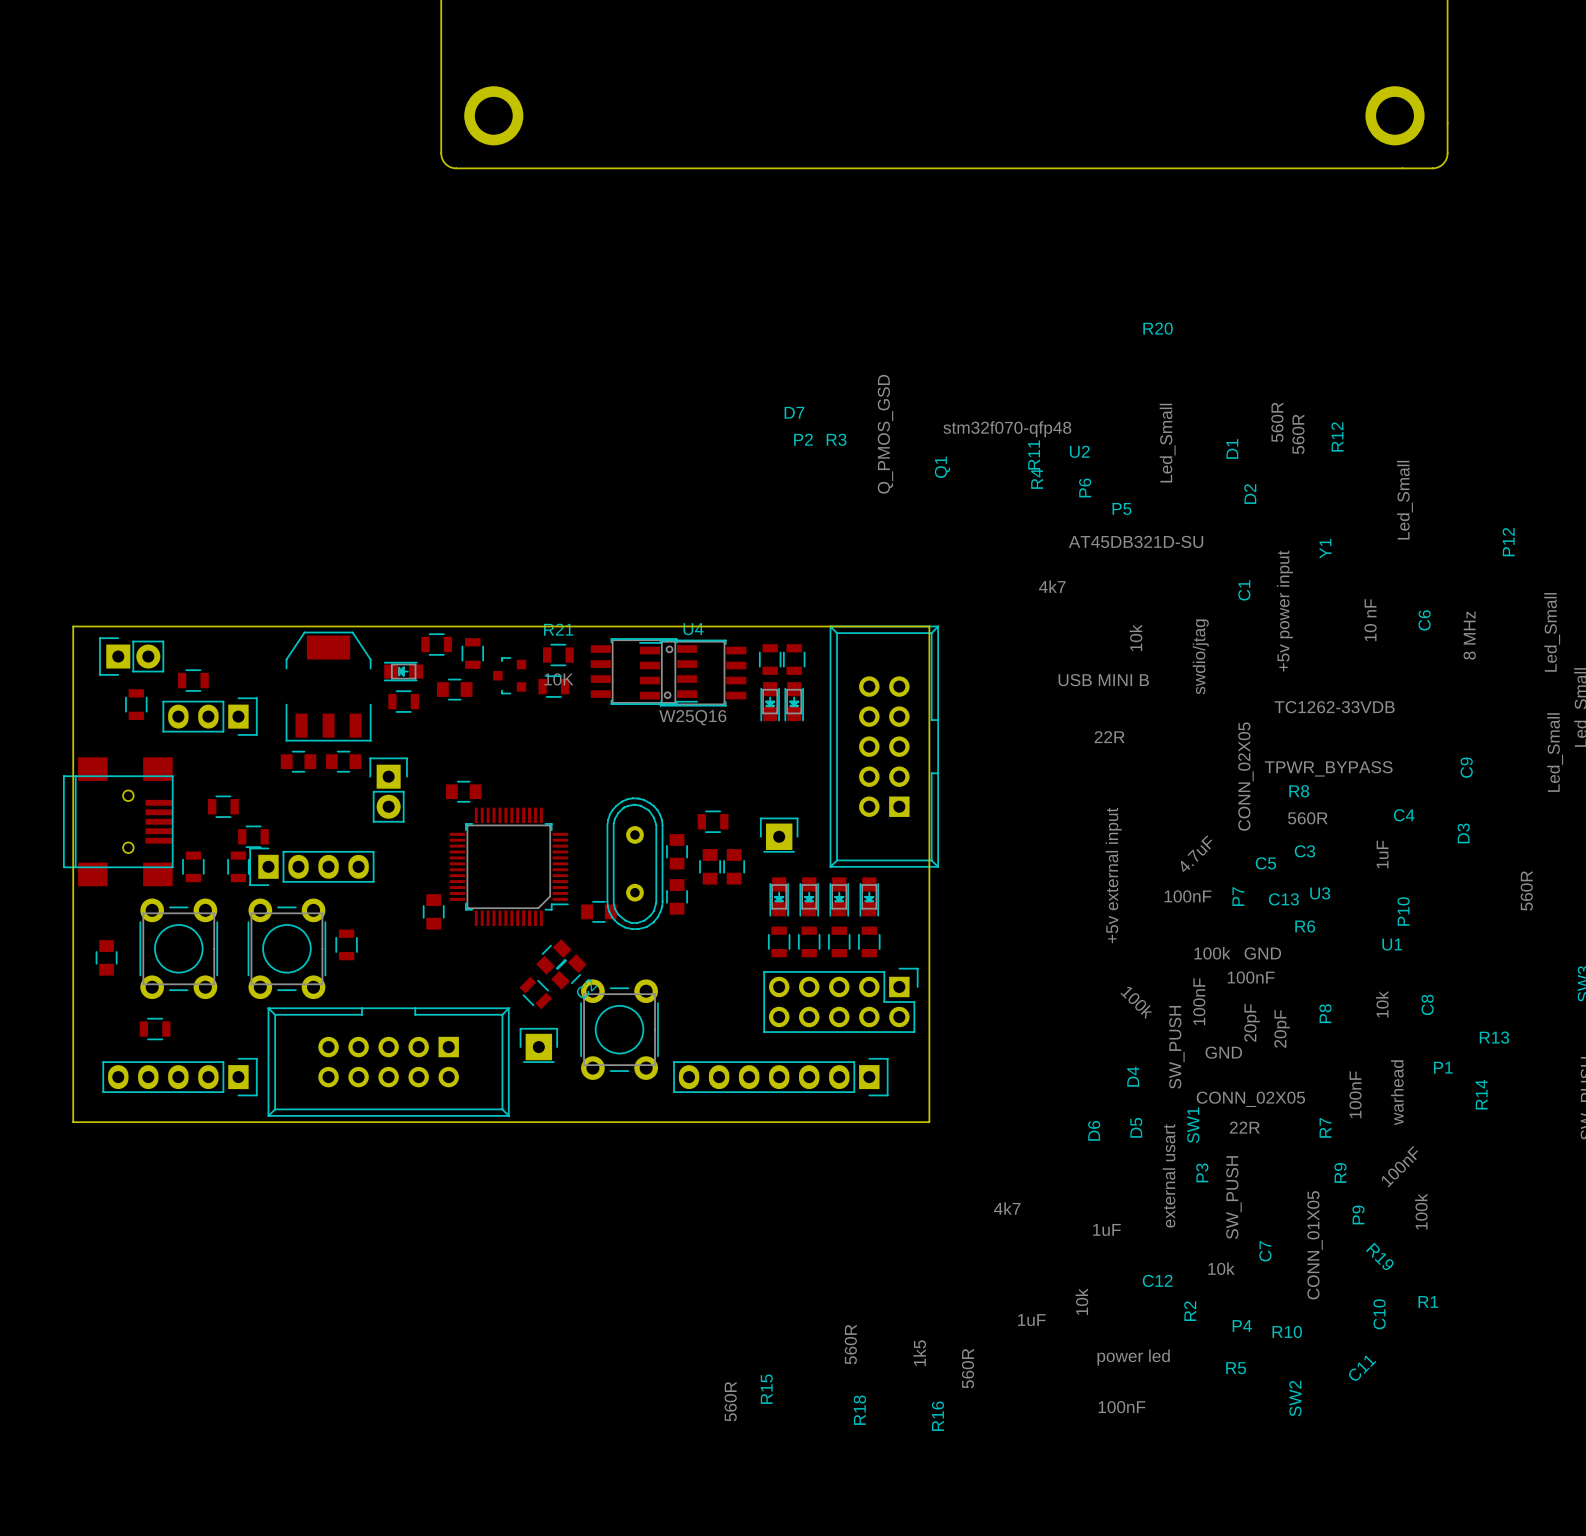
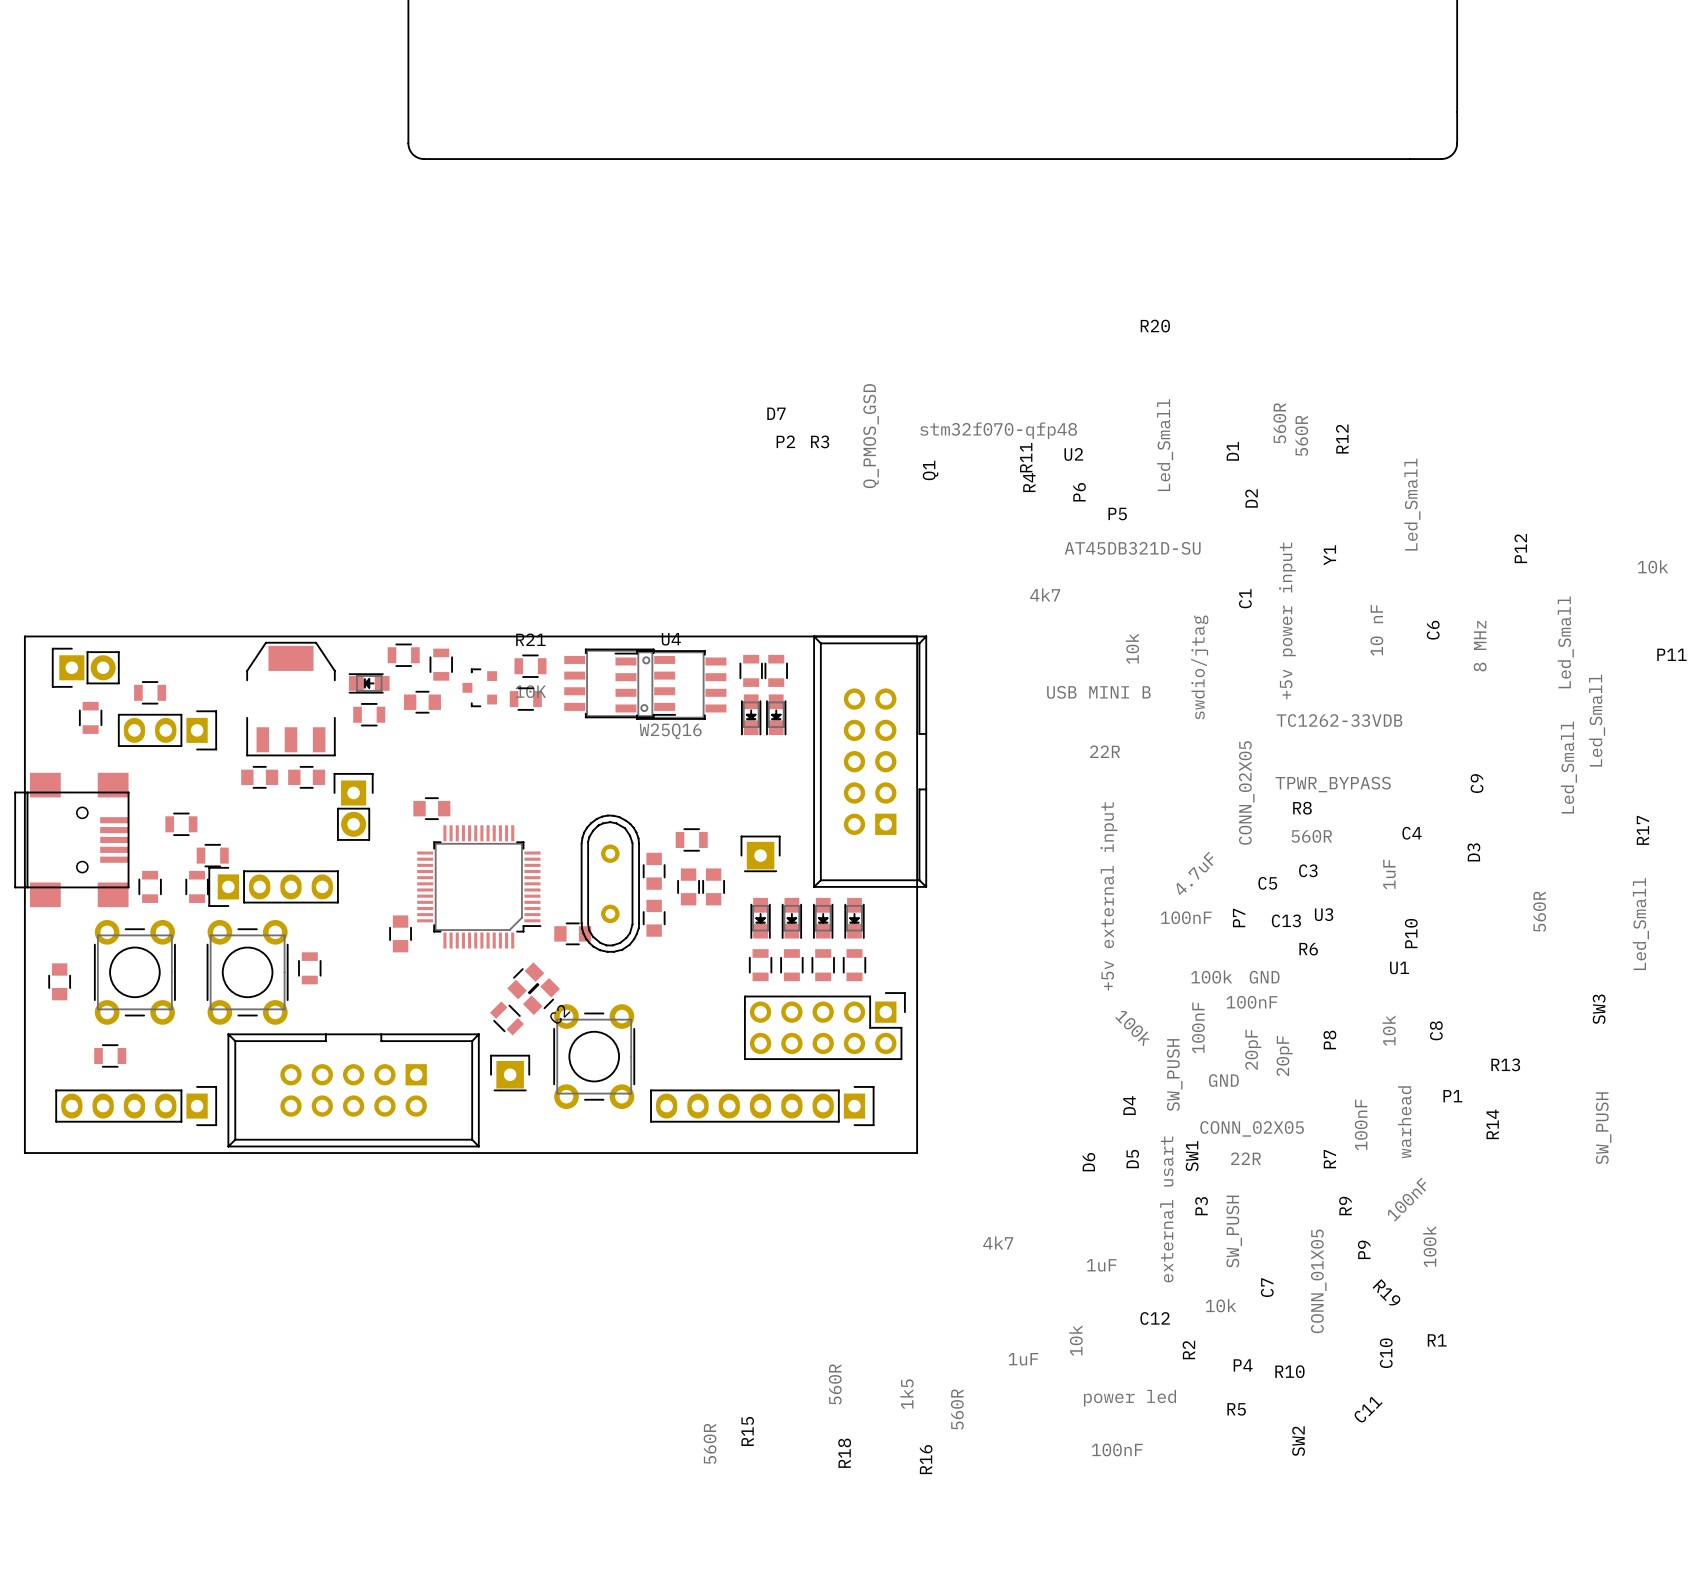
part: (493, 115) -> none
part: (1395, 115) -> none

